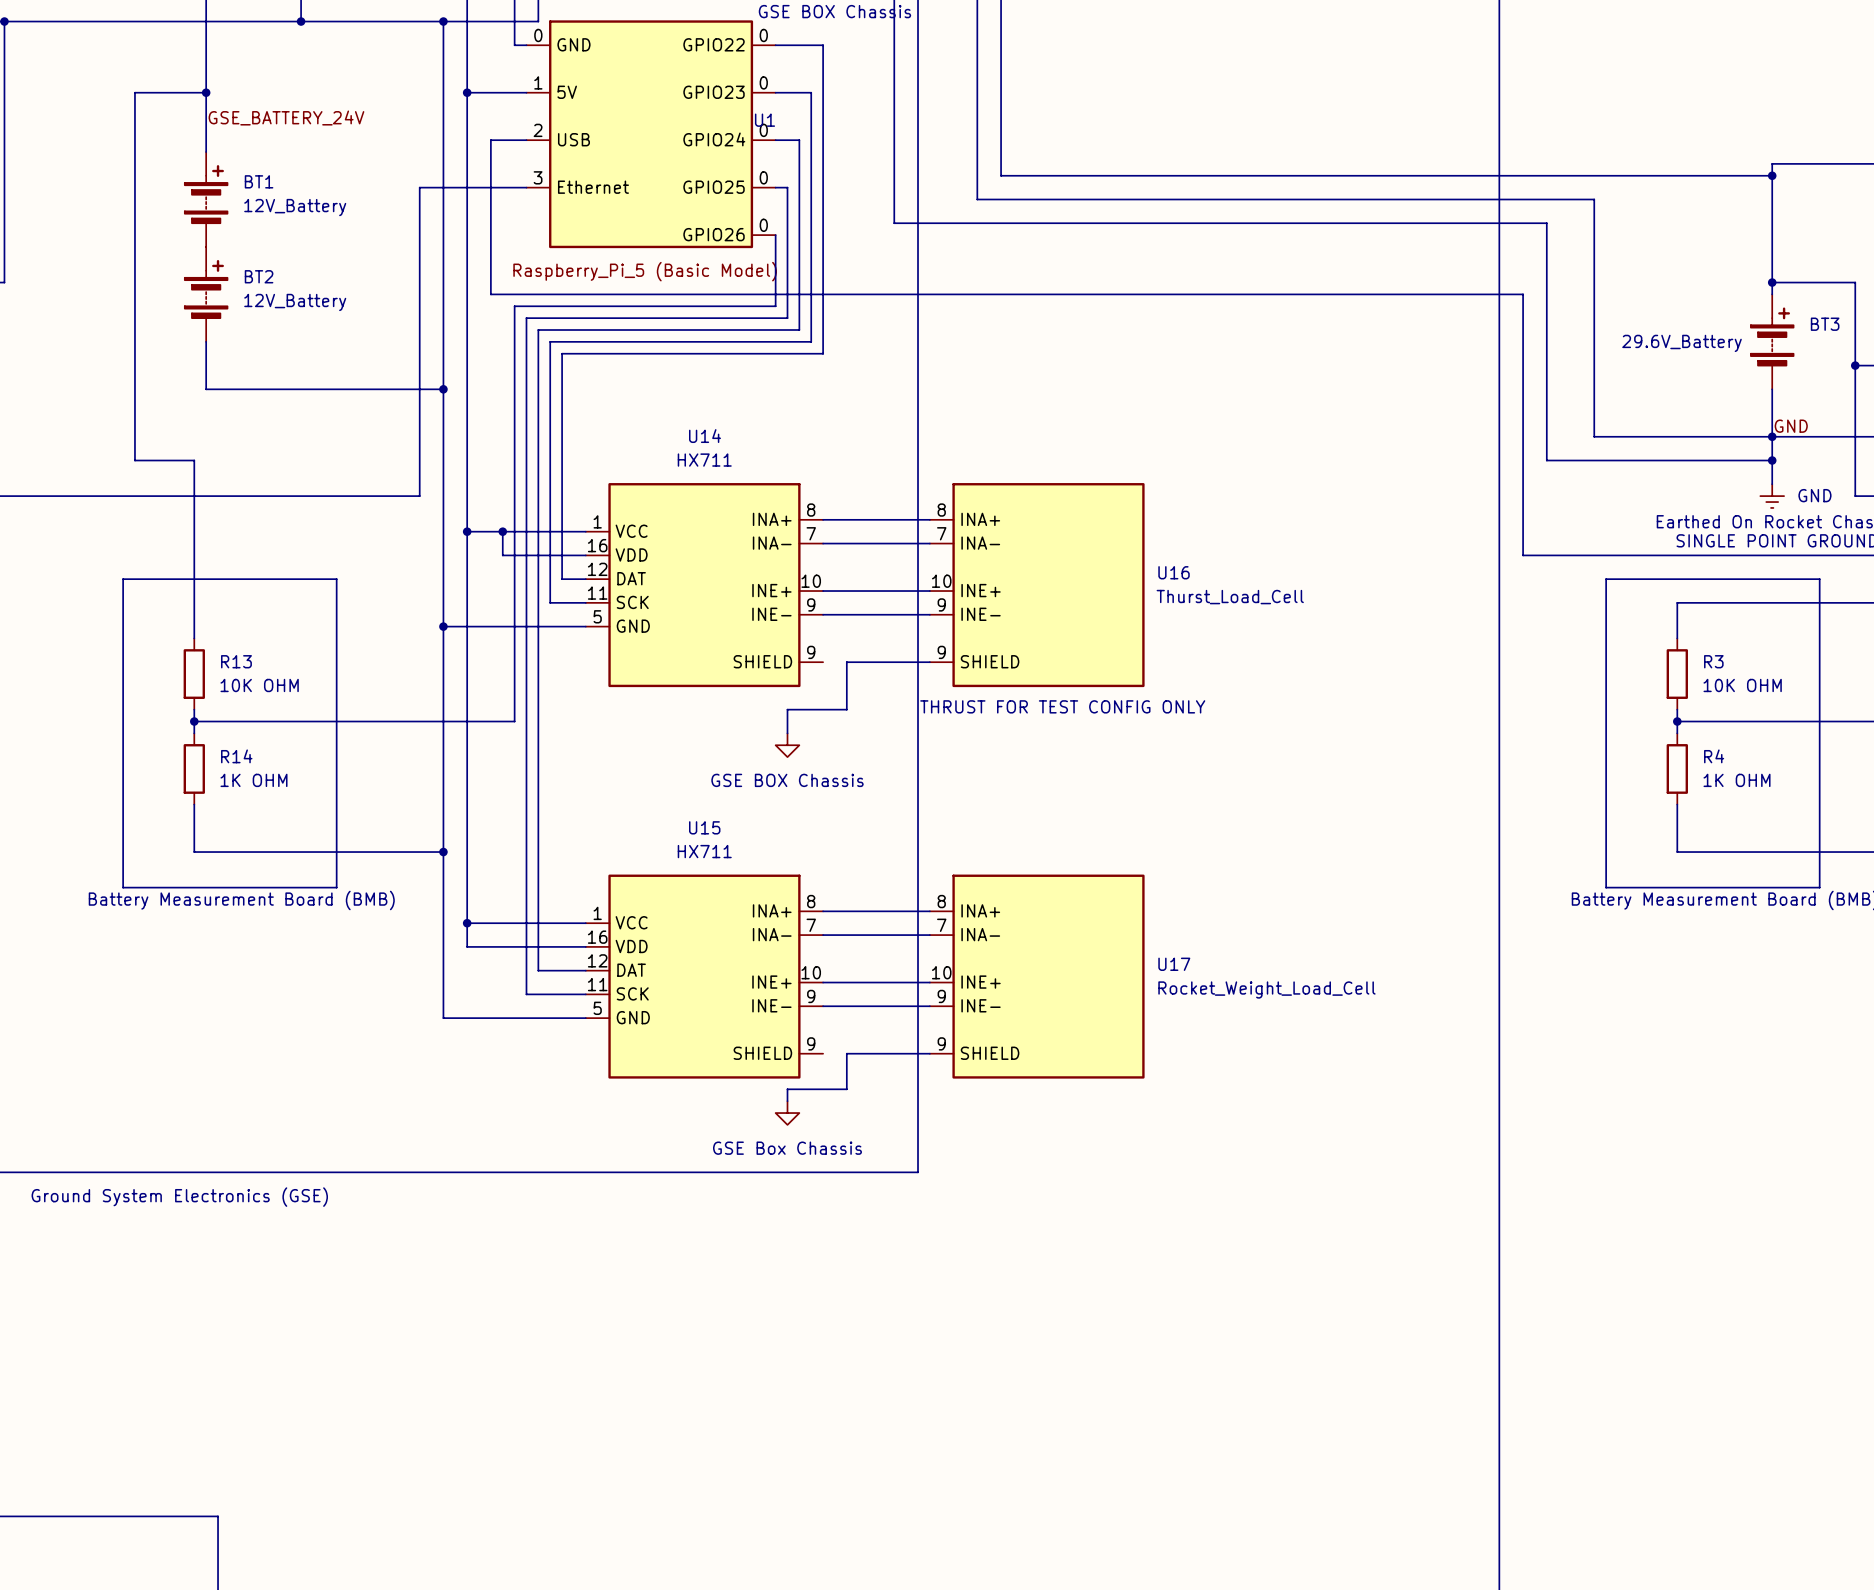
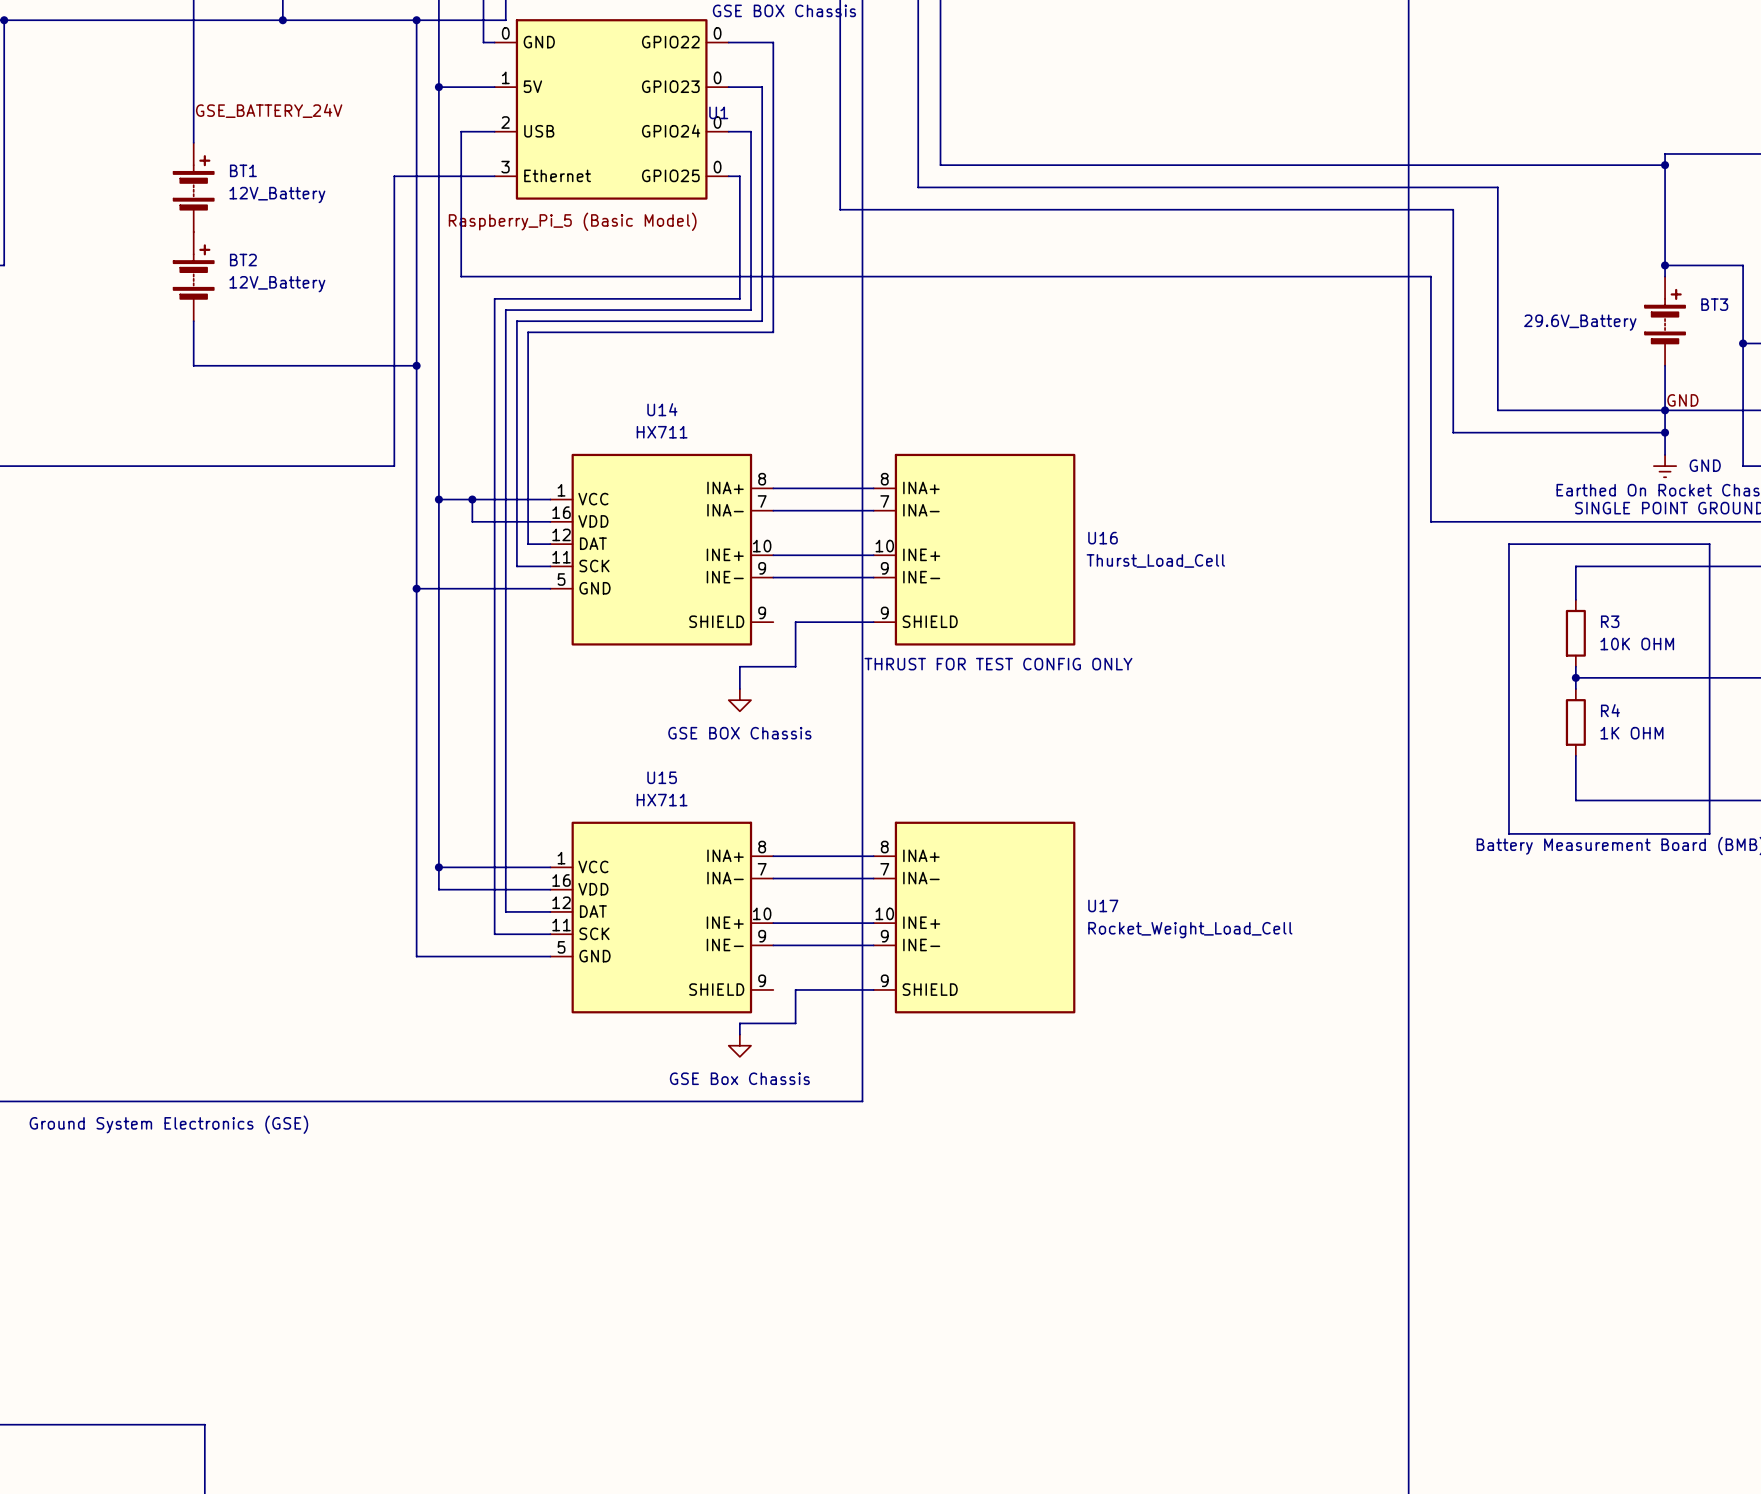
U1 symbol: [526, 20, 776, 249] -> [494, 19, 729, 200]
wire: (206, 92) (134, 92) (134, 460) (194, 460) (194, 638) -> none
junction: (206, 92) -> none
wire: (775, 235) (775, 306) (514, 306) (514, 721) (194, 721) -> none
line: (123, 579) (336, 579) (336, 887) (123, 887) (123, 579) -> none
R13: 10K OHM (194, 674) -> none
wire: (194, 709) (194, 733) -> none
junction: (194, 721) -> none
R14: 1K OHM (194, 768) -> none
wire: (194, 804) (194, 852) (443, 852) -> none
junction: (443, 852) -> none
text: Battery Measurement Board (BMB) (241, 900) -> none

